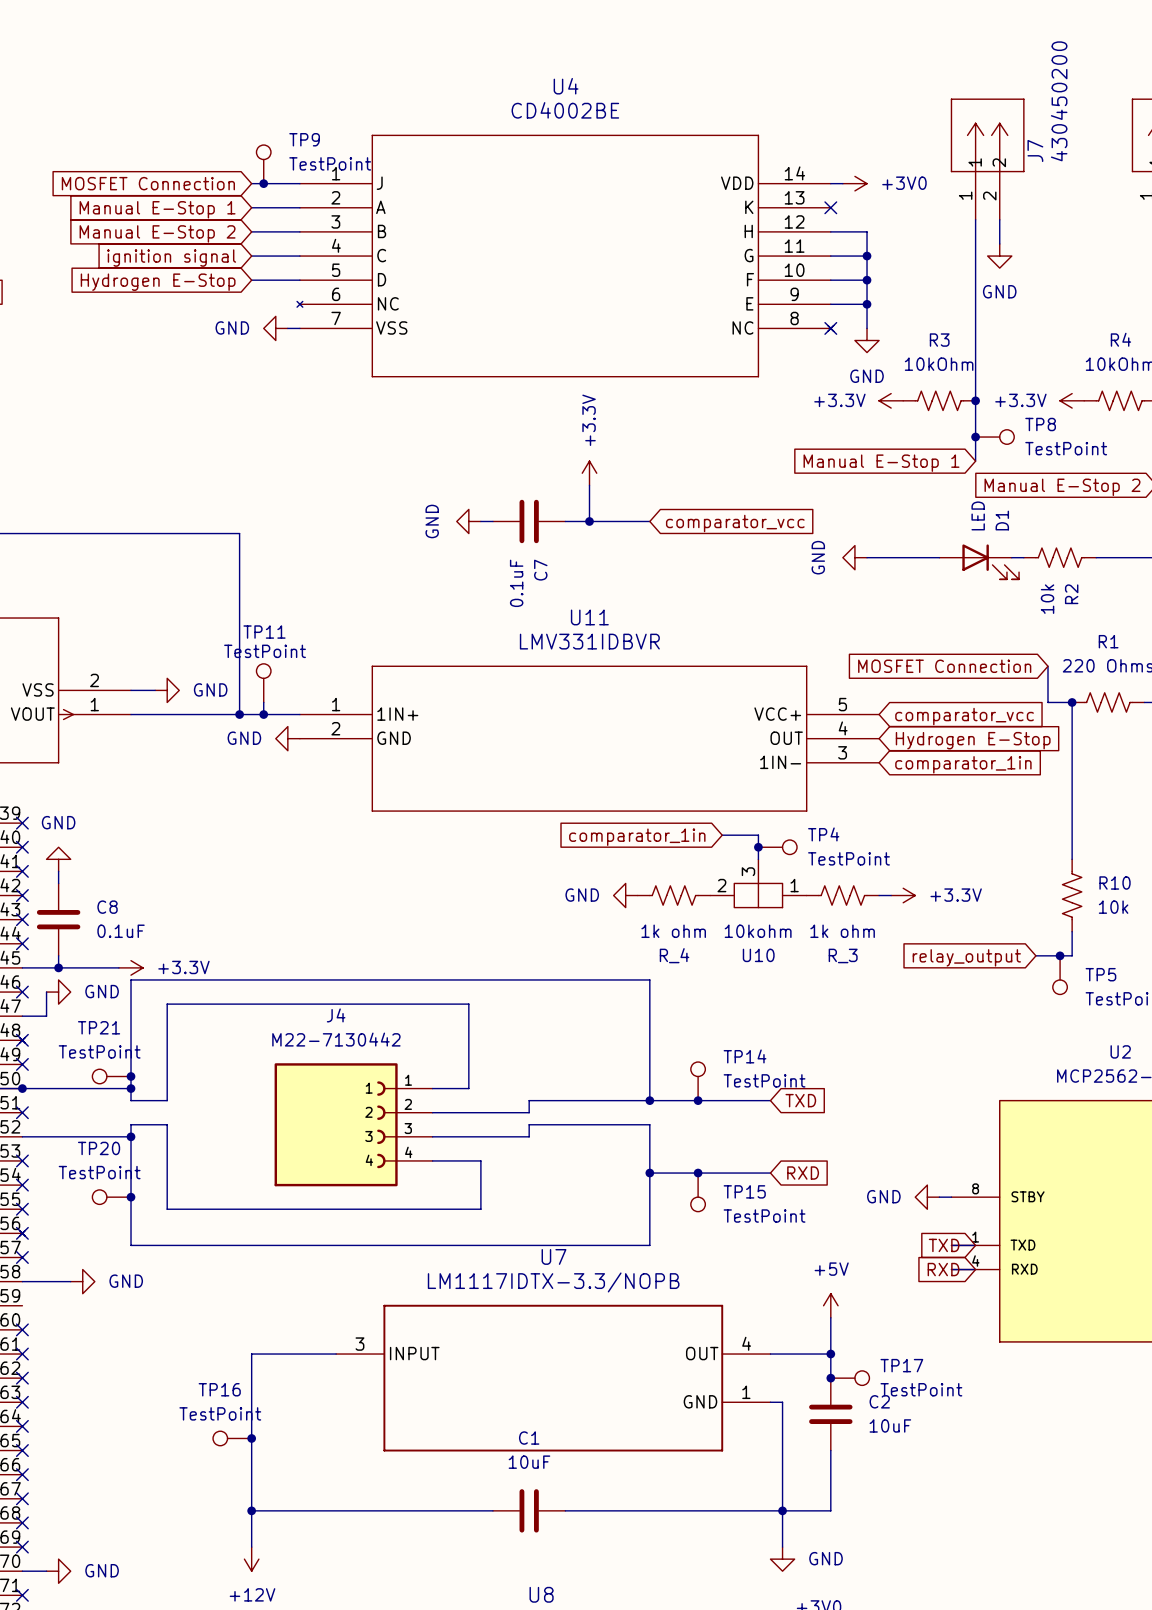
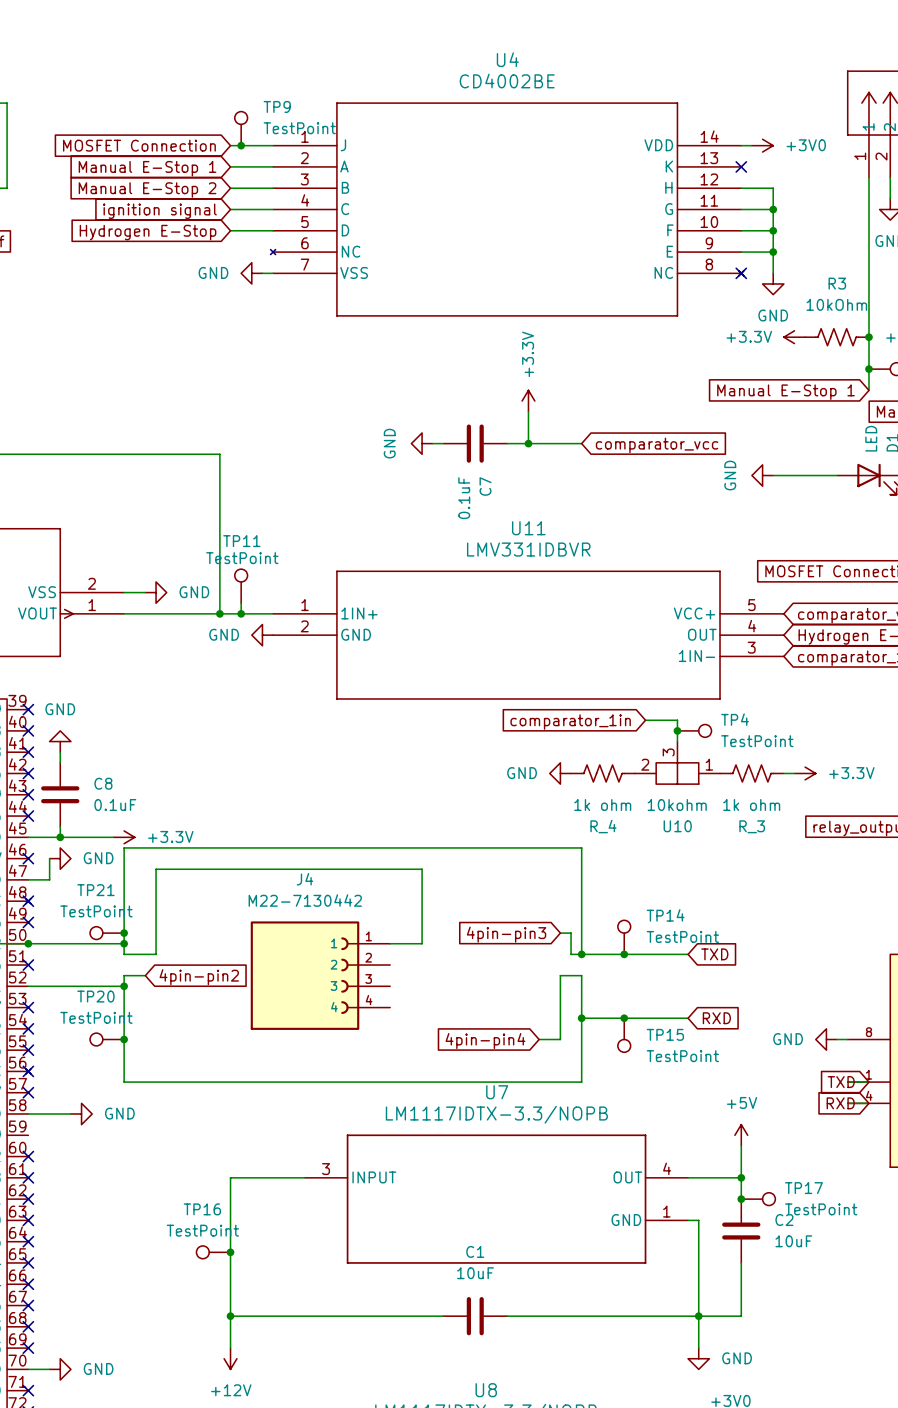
global label: none -> 4pin-pin3 (506, 934)
wire: (637, 1100) (529, 1100) (529, 1112) (432, 1112) -> (571, 954) (571, 933) (560, 933)
wire: (155, 1124) (167, 1124) (167, 1209) (480, 1209) (480, 1160) (432, 1160) -> none
wire: (625, 1124) (529, 1124) (529, 1136) (432, 1136) -> (560, 975) (560, 1039) (539, 1039)
global label: none -> 4pin-pin2 (199, 977)
global label: none -> 4pin-pin4 (485, 1041)

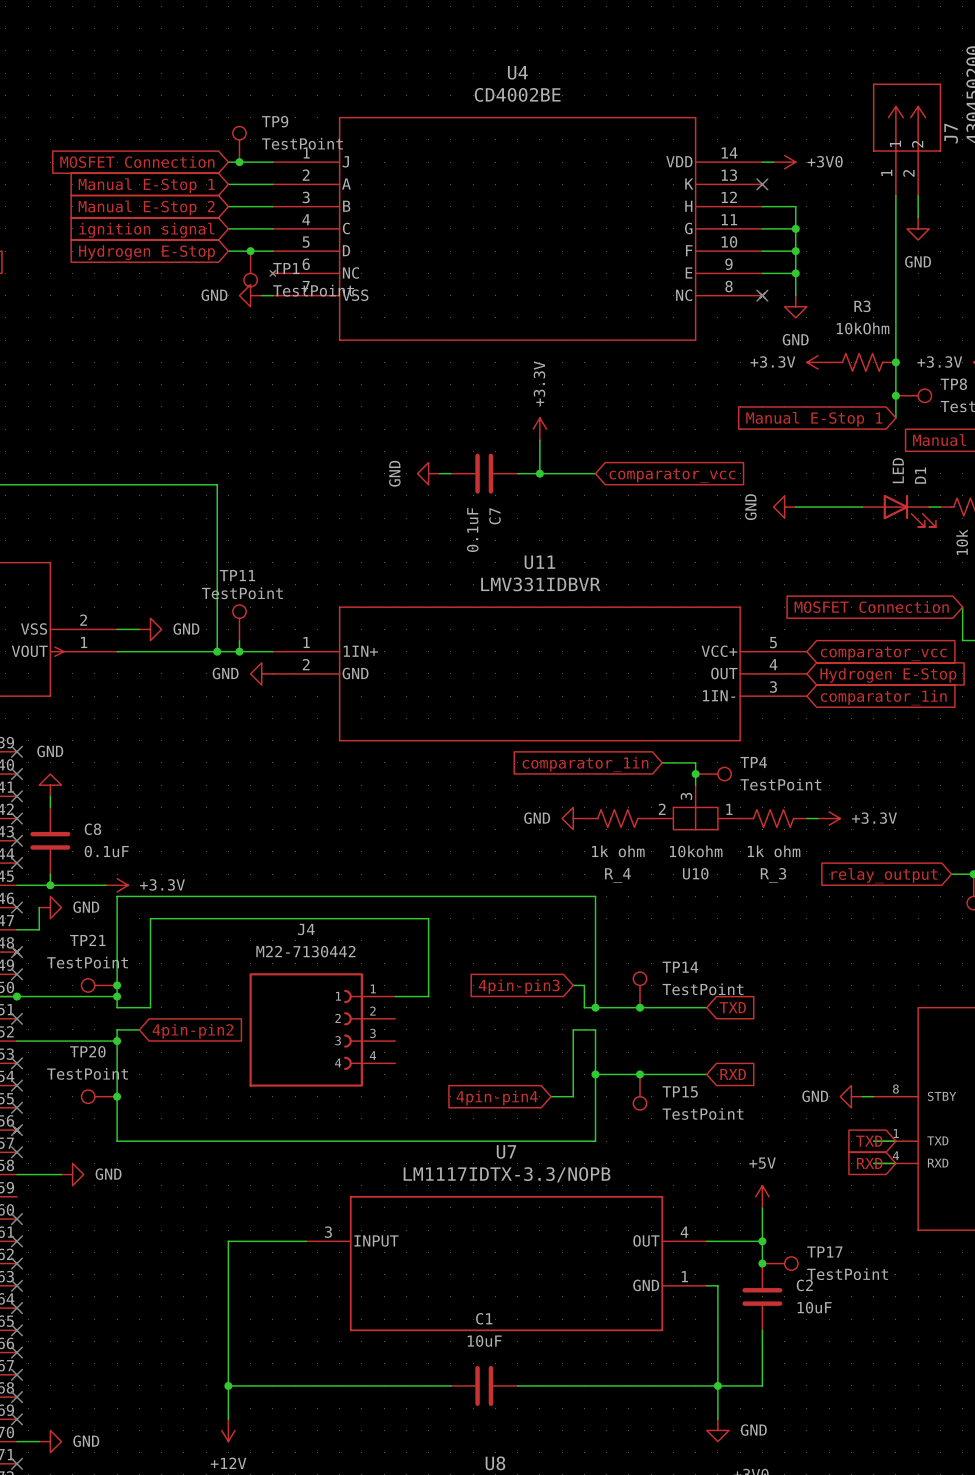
junction: none -> (250, 251)
TP1: none -> TestPoint (250, 268)
TP16: TestPoint (213, 1252) -> none
junction: (230, 1252) -> none

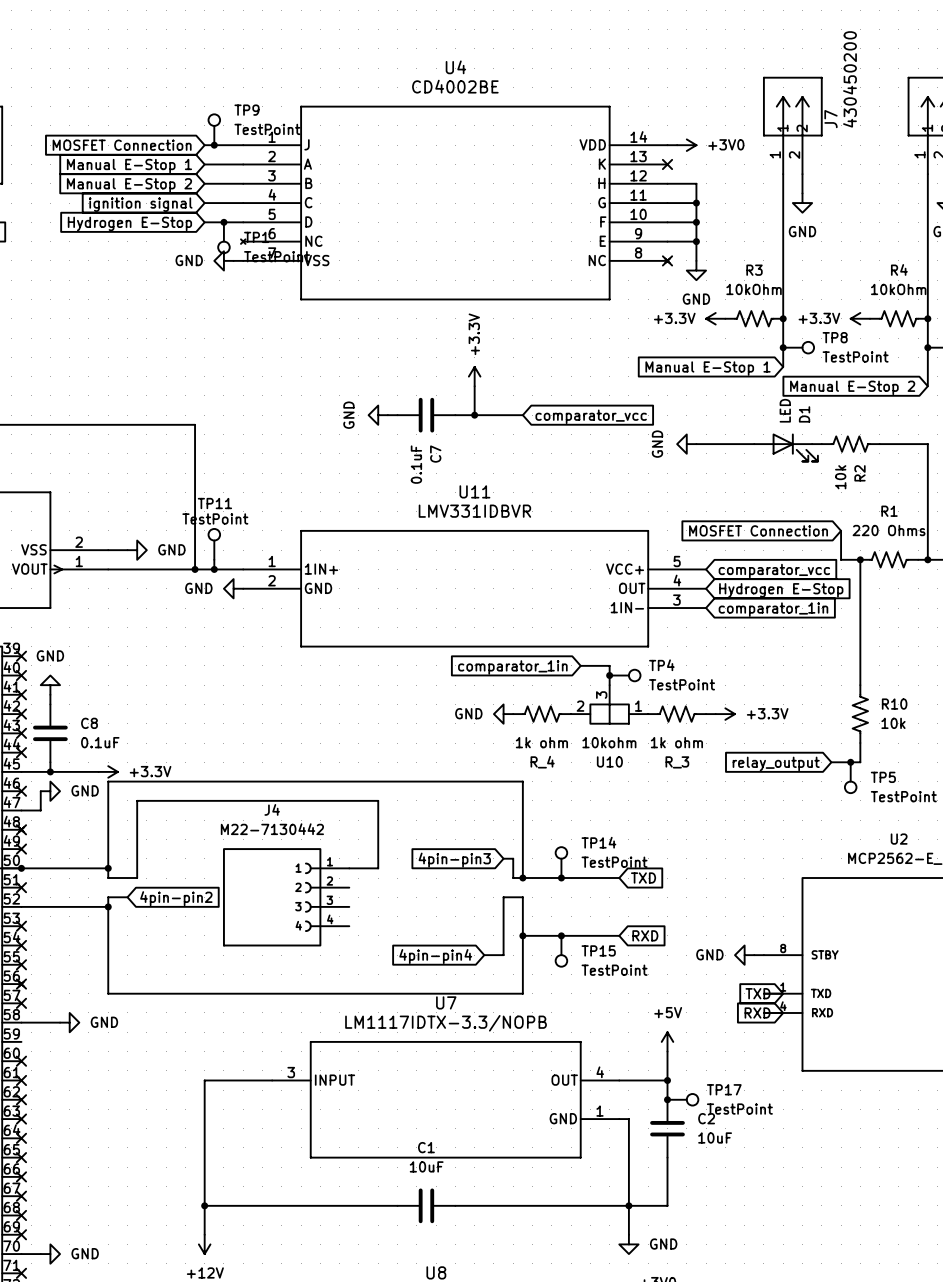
TP21: TestPoint (99, 985) -> none
junction: (117, 985) -> none
TP20: TestPoint (99, 1096) -> none
junction: (117, 1096) -> none

